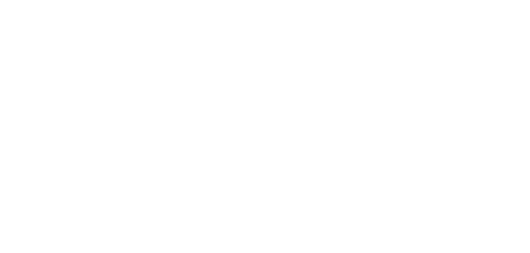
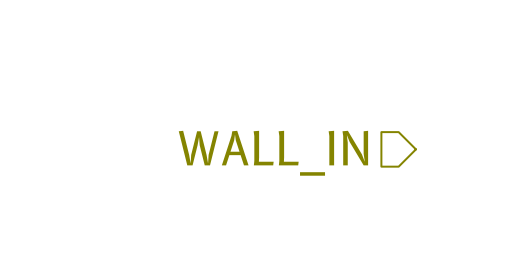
hierarchical label: none -> WALL_IN (273, 153)

